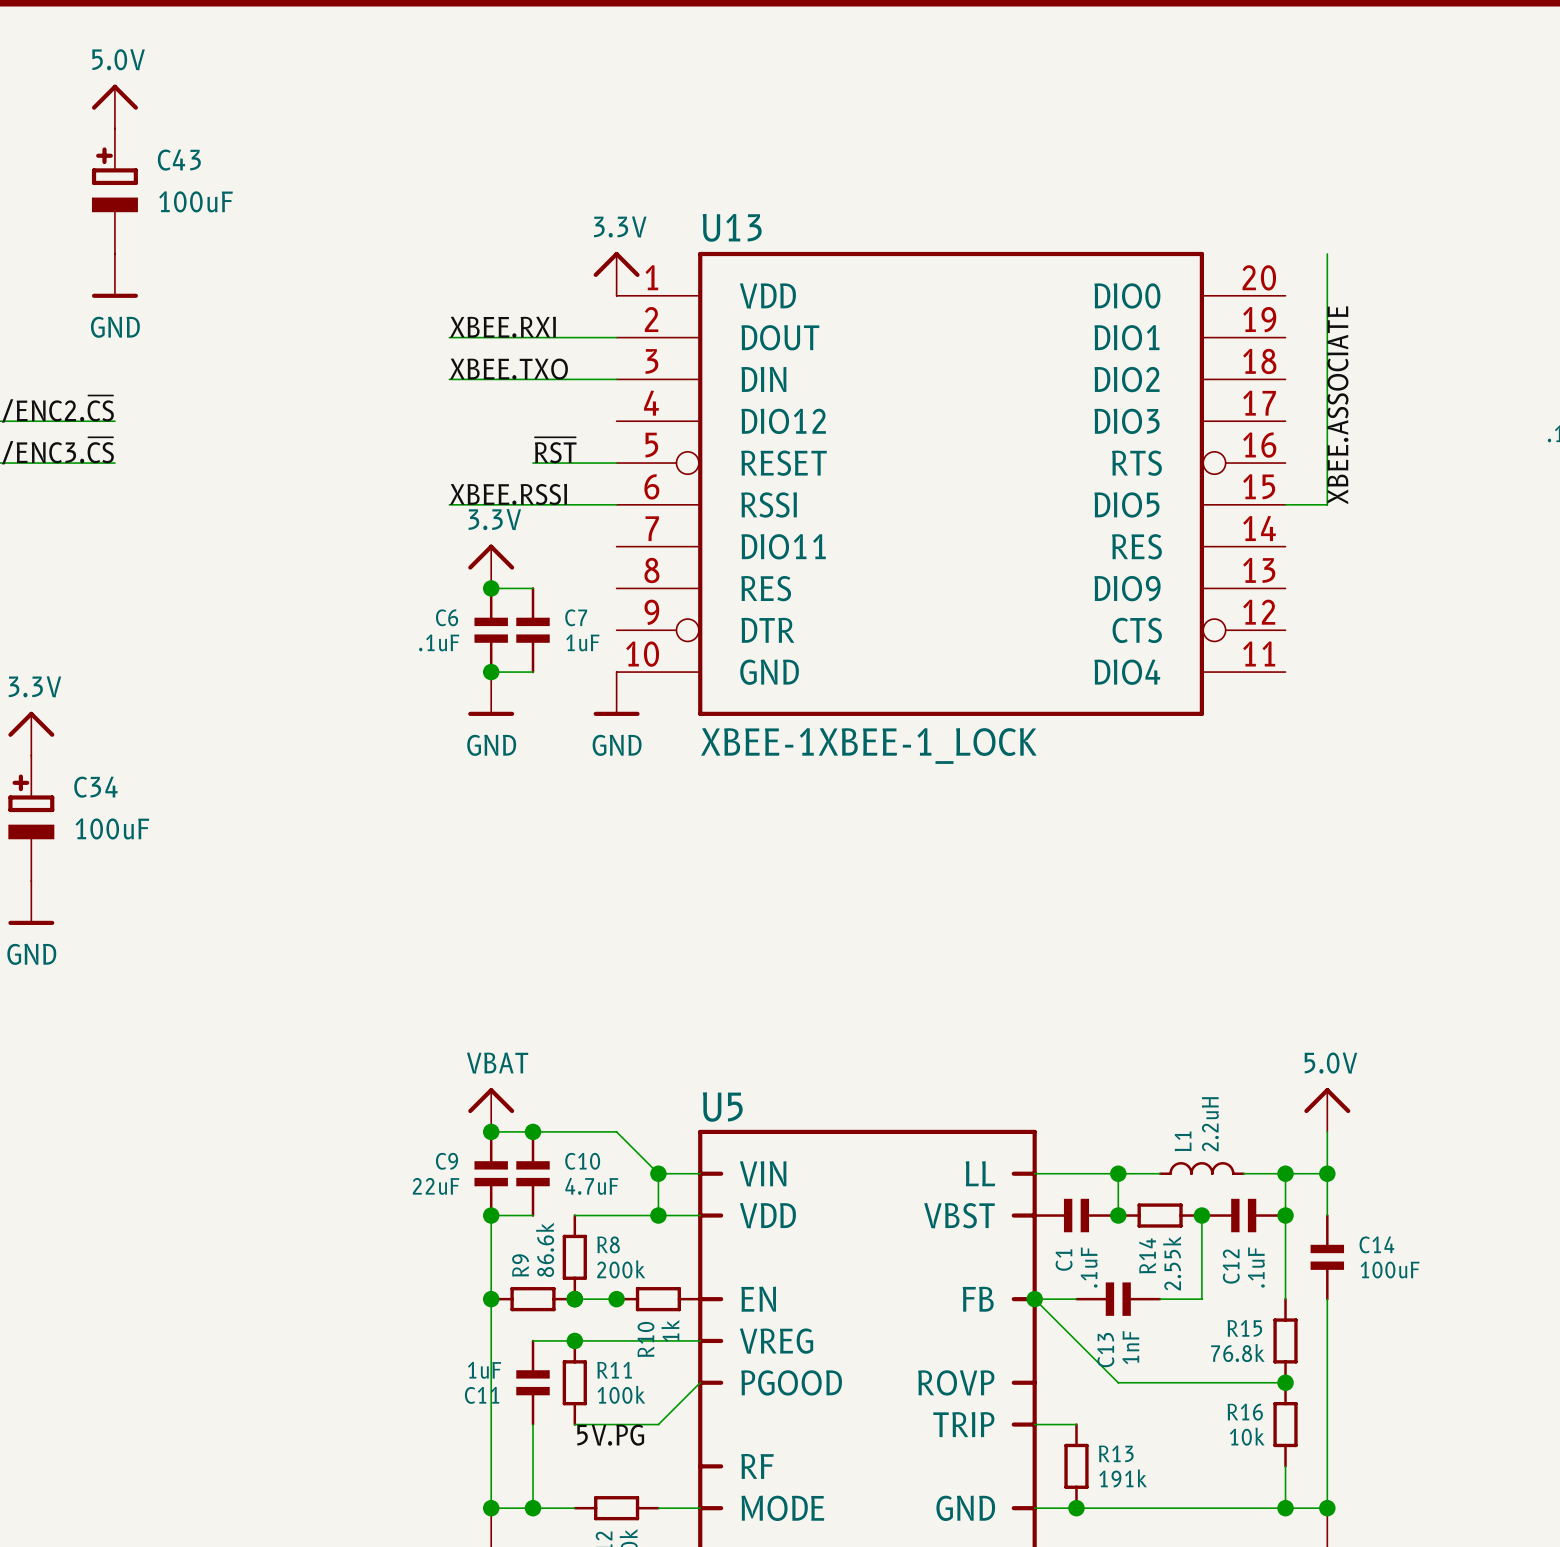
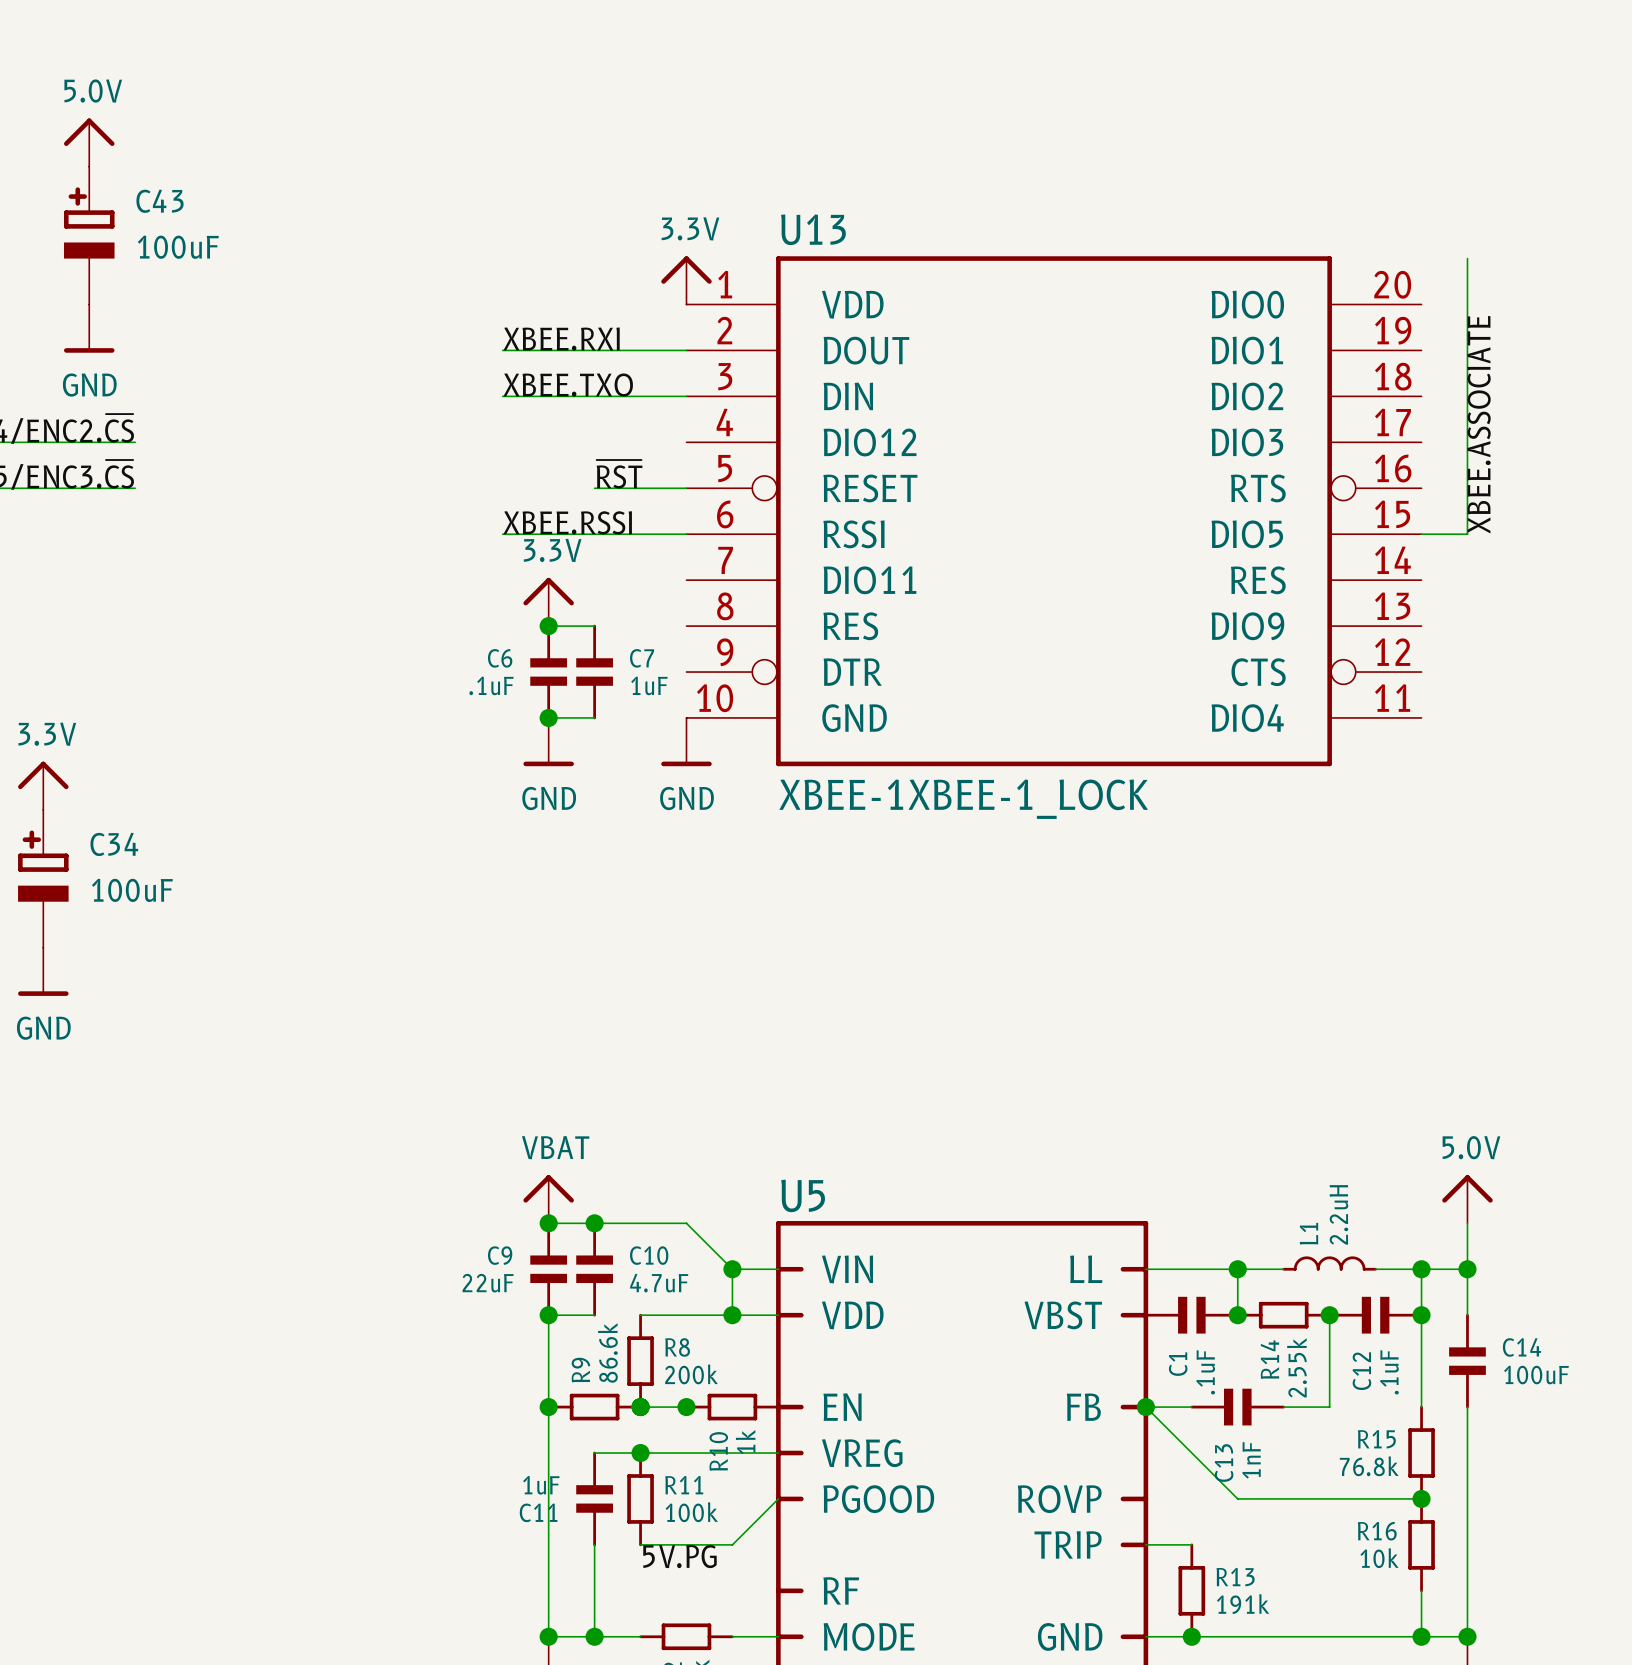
power symbol position: 5.0V (114, 106) -> 5.0V (89, 142)
C43 position: (114, 191) -> (89, 235)
power symbol position: GND (114, 275) -> GND (89, 328)

